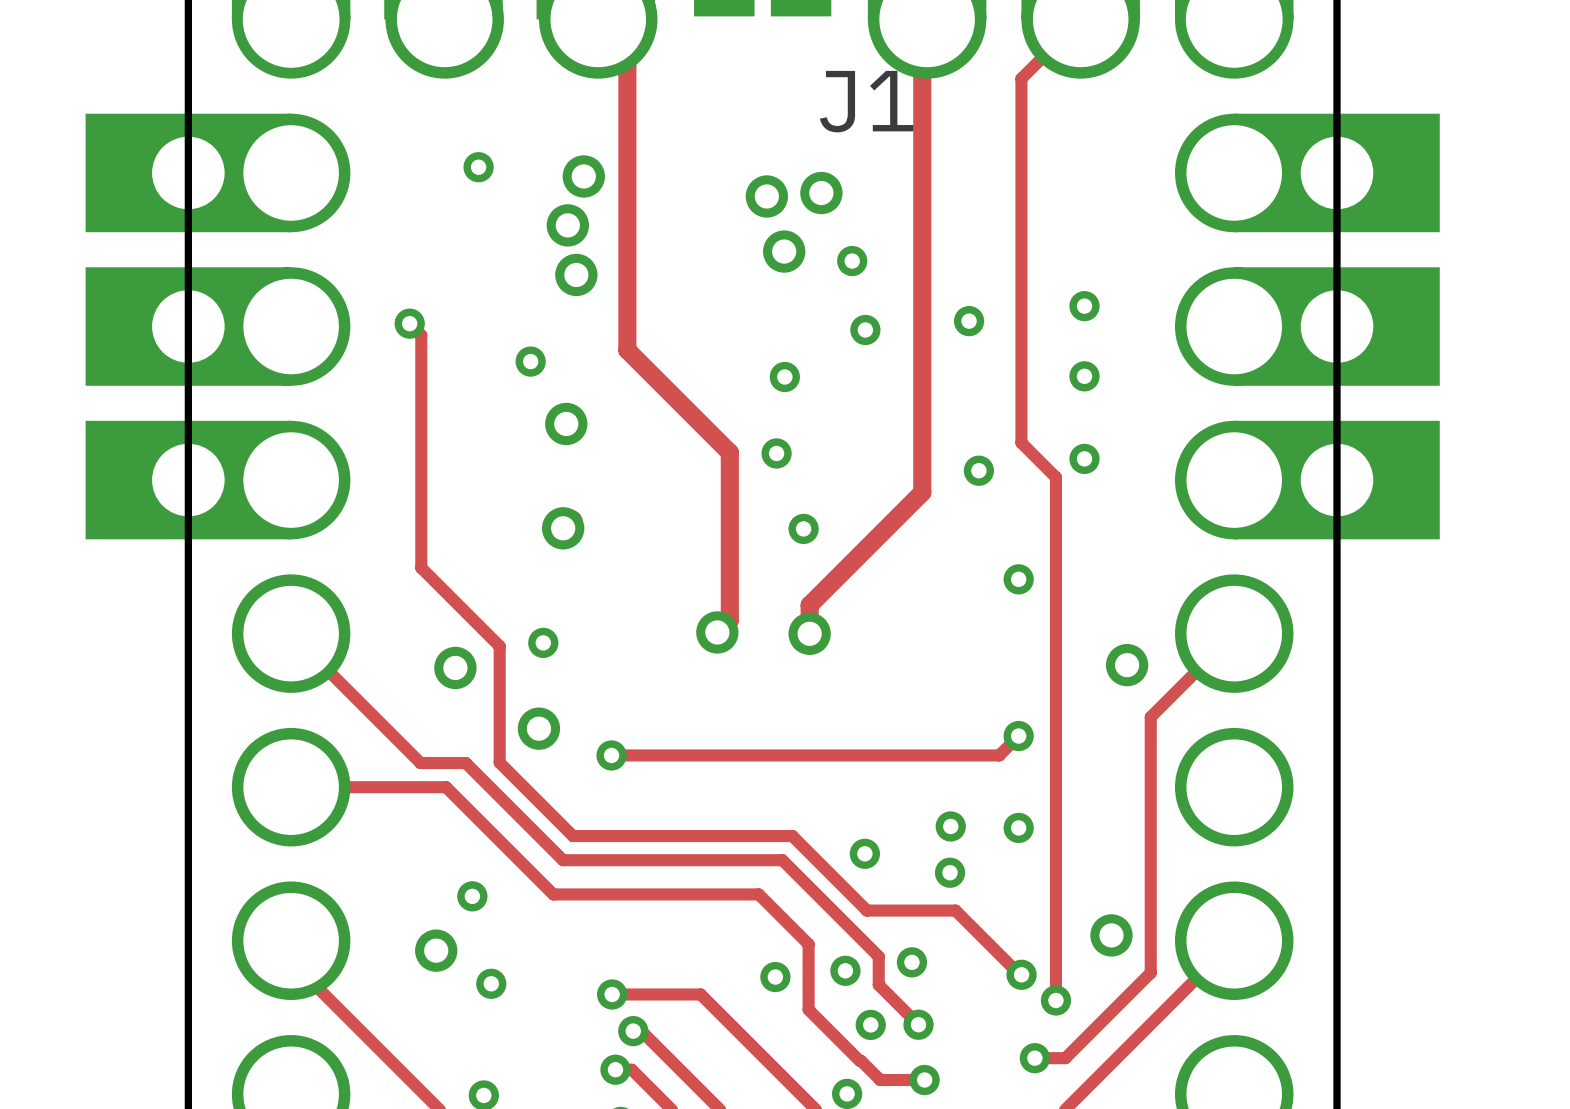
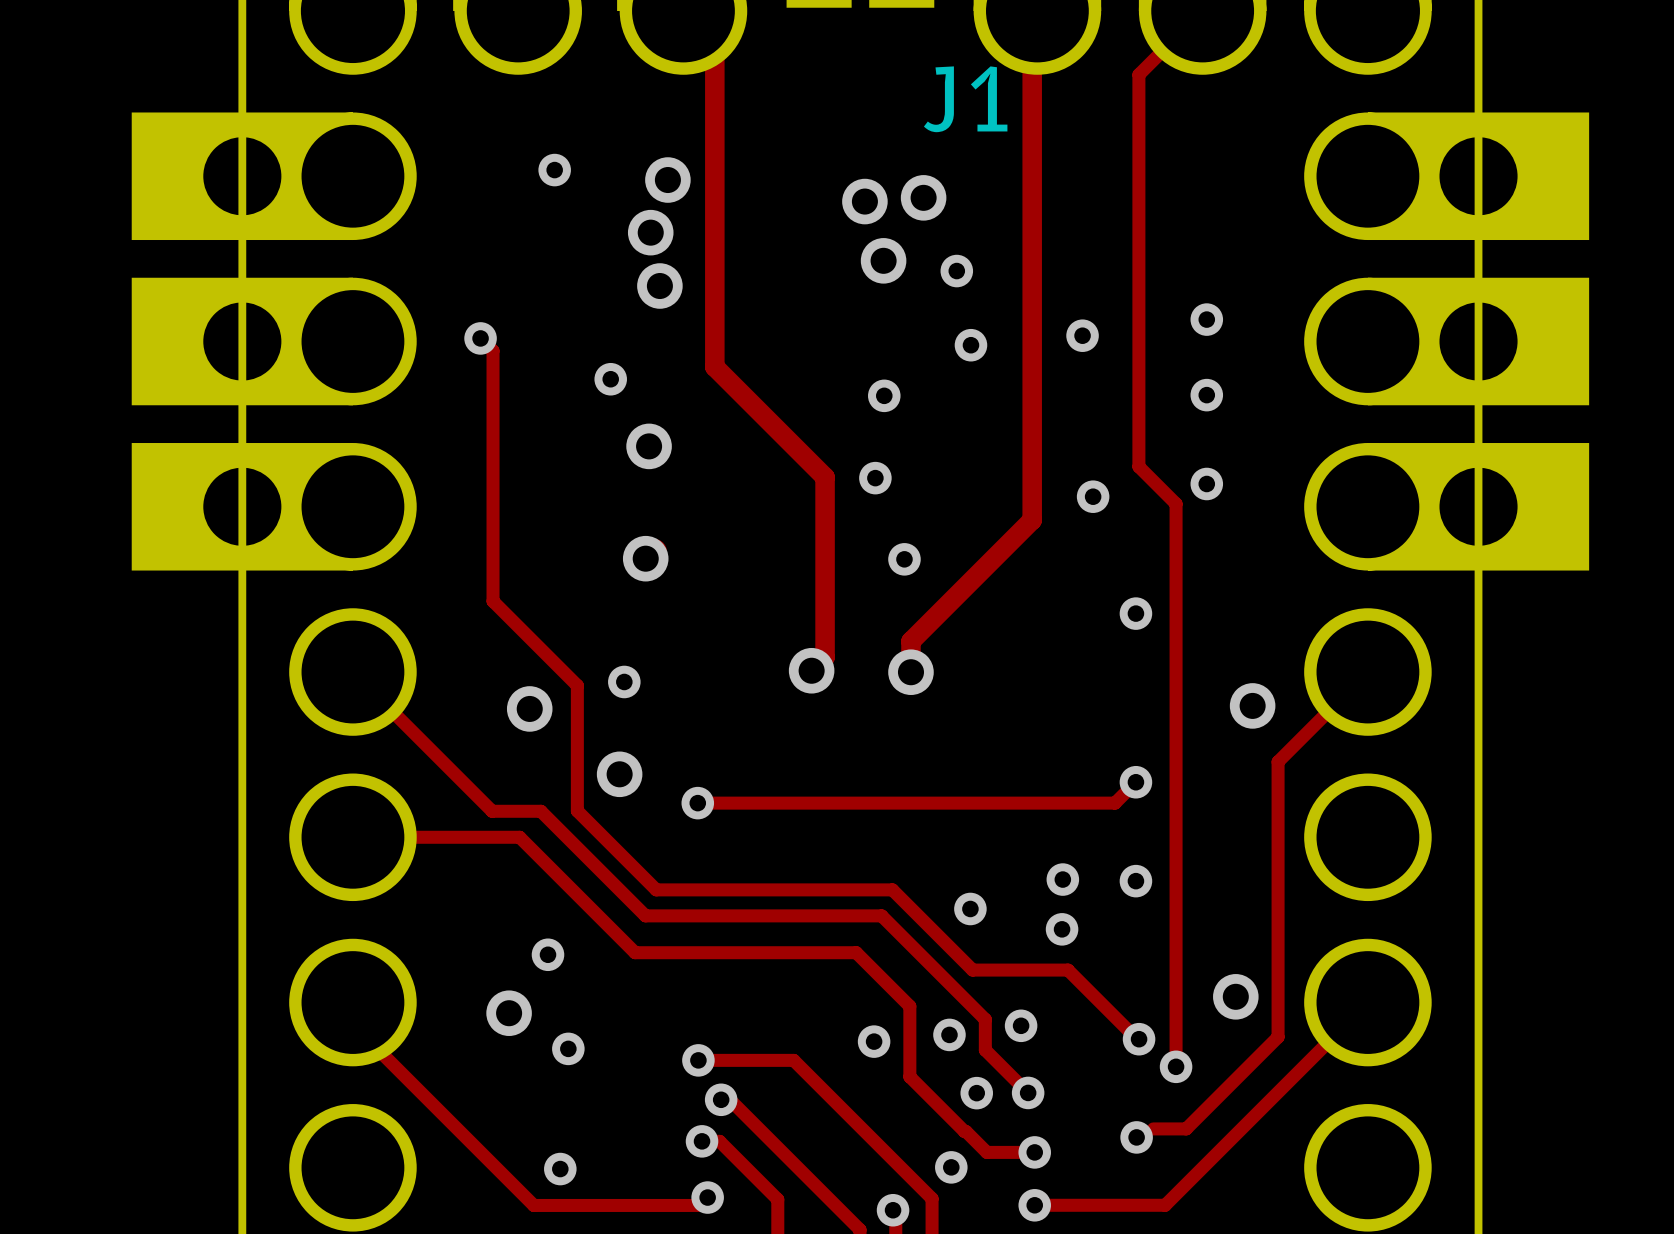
via position: (1034, 1058) -> (1136, 1137)

